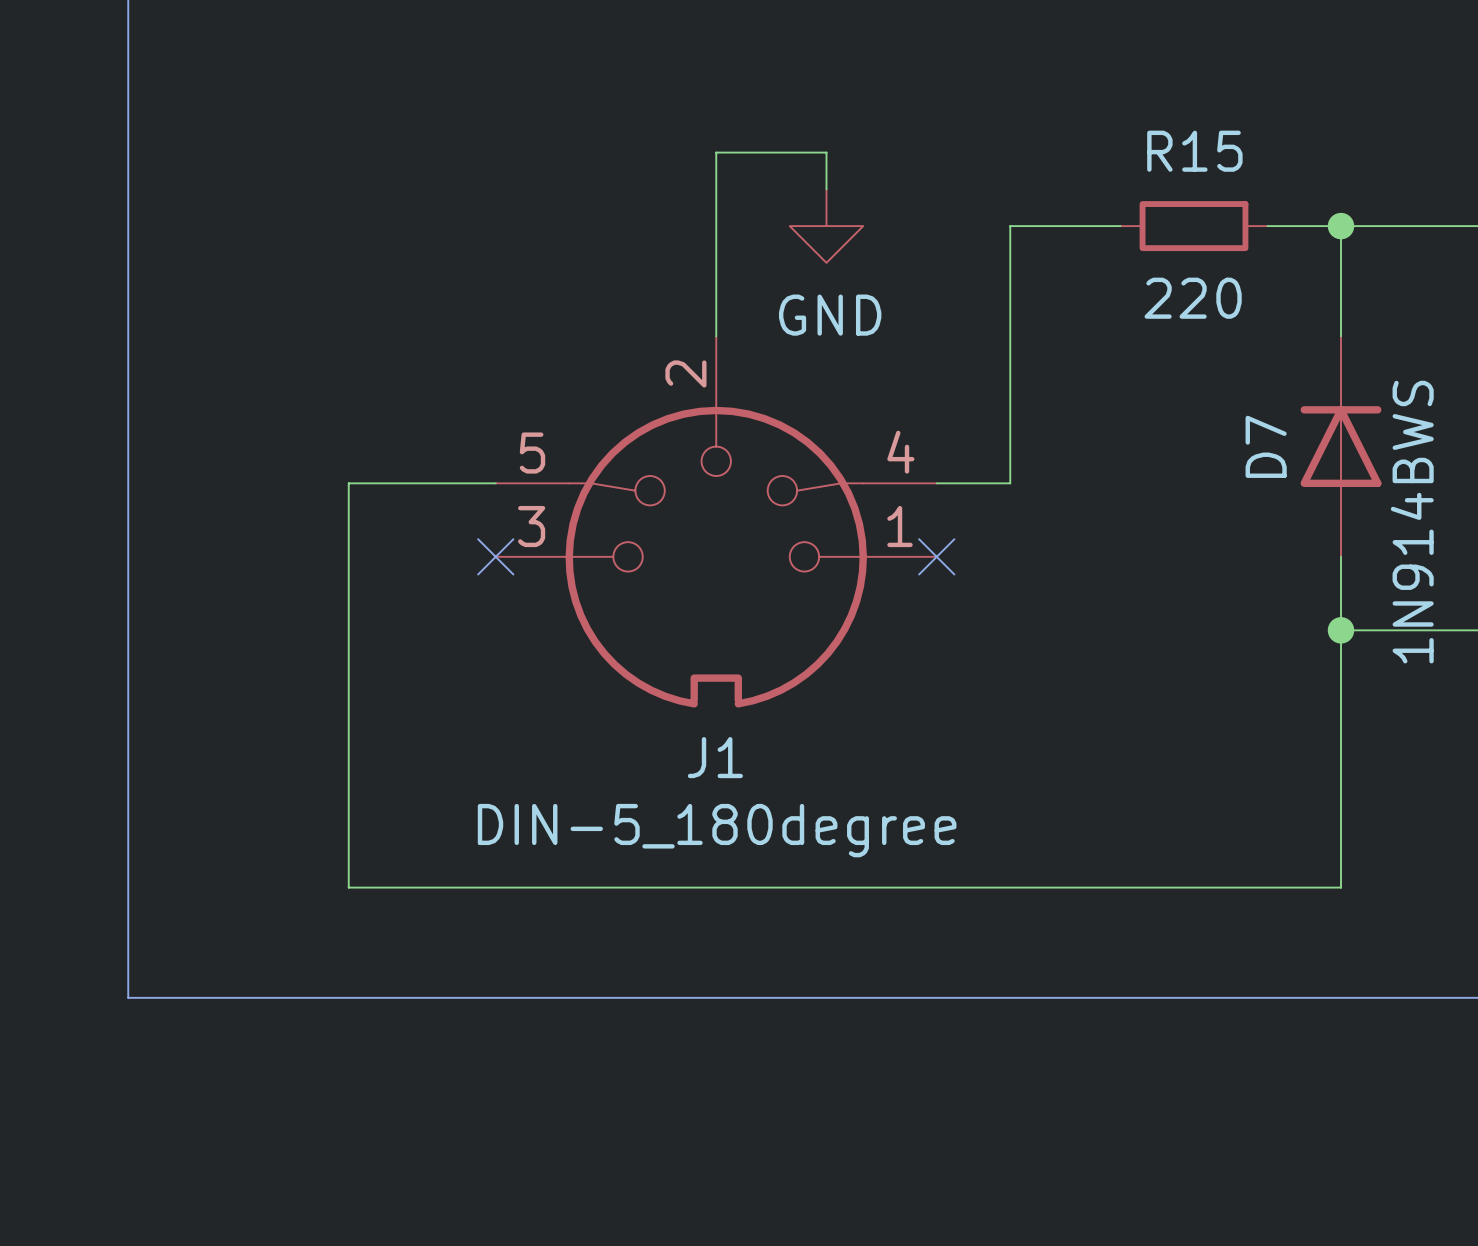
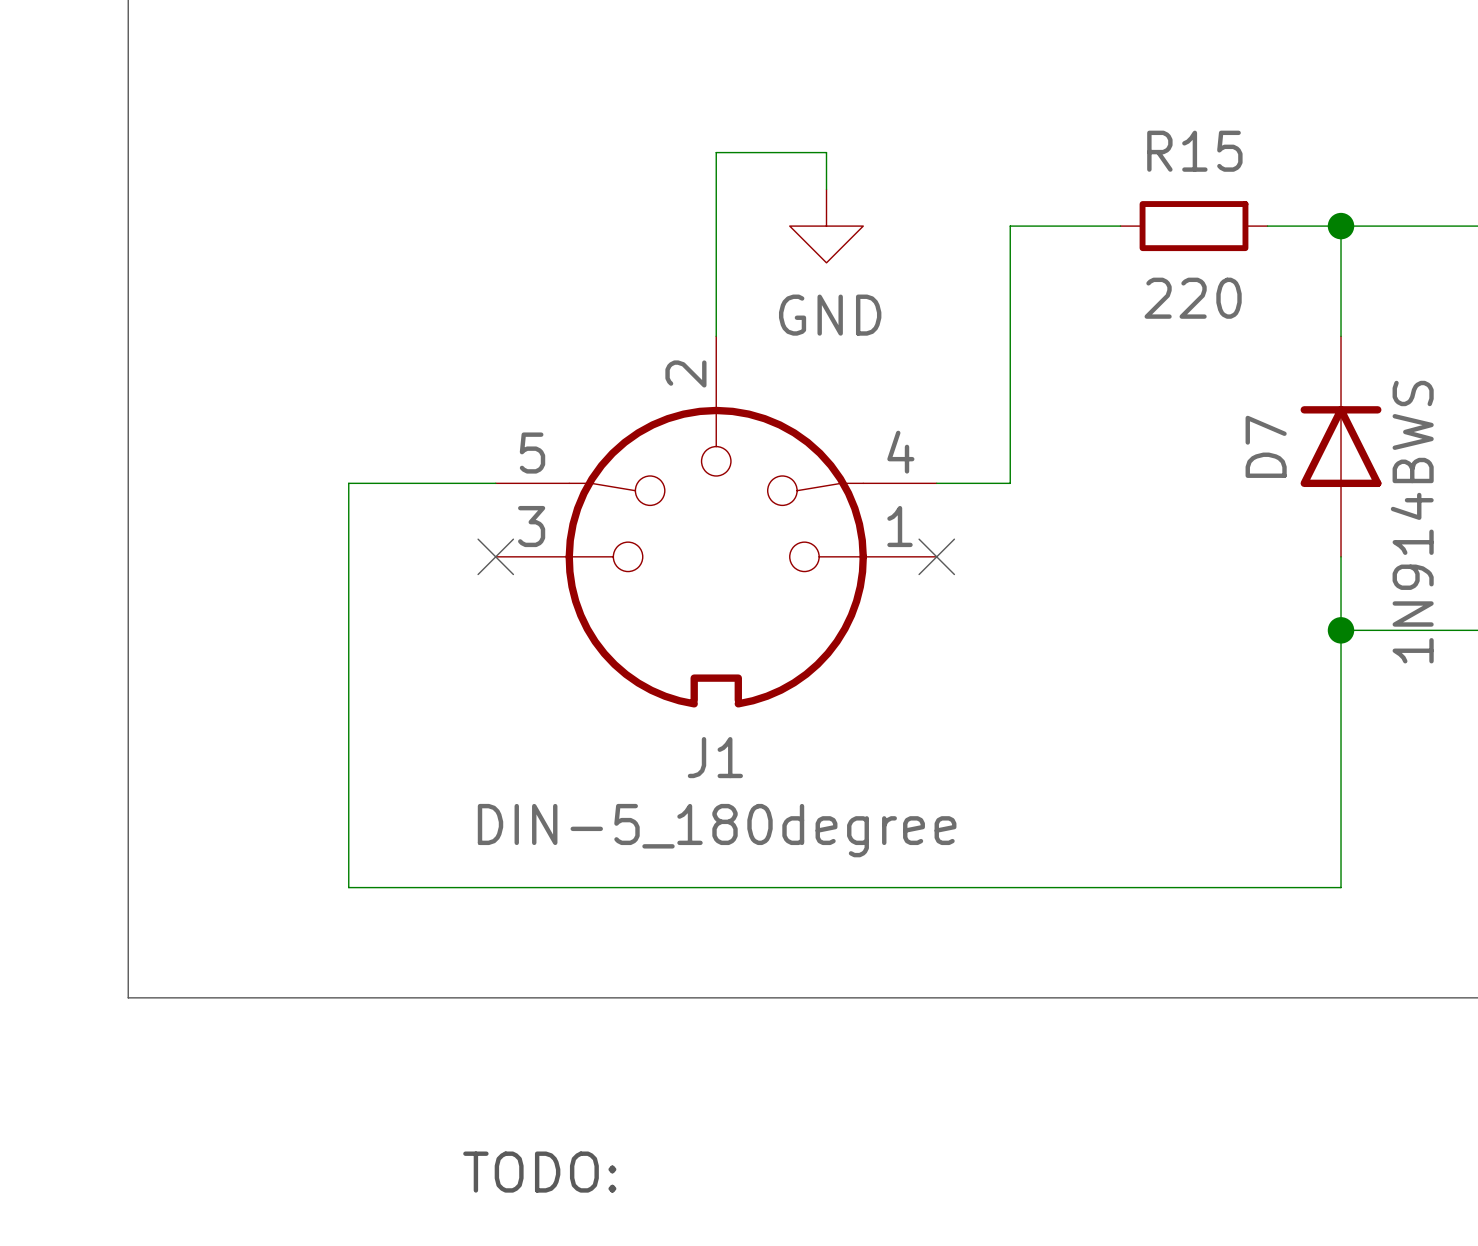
text: none -> TODO: (539, 1172)

